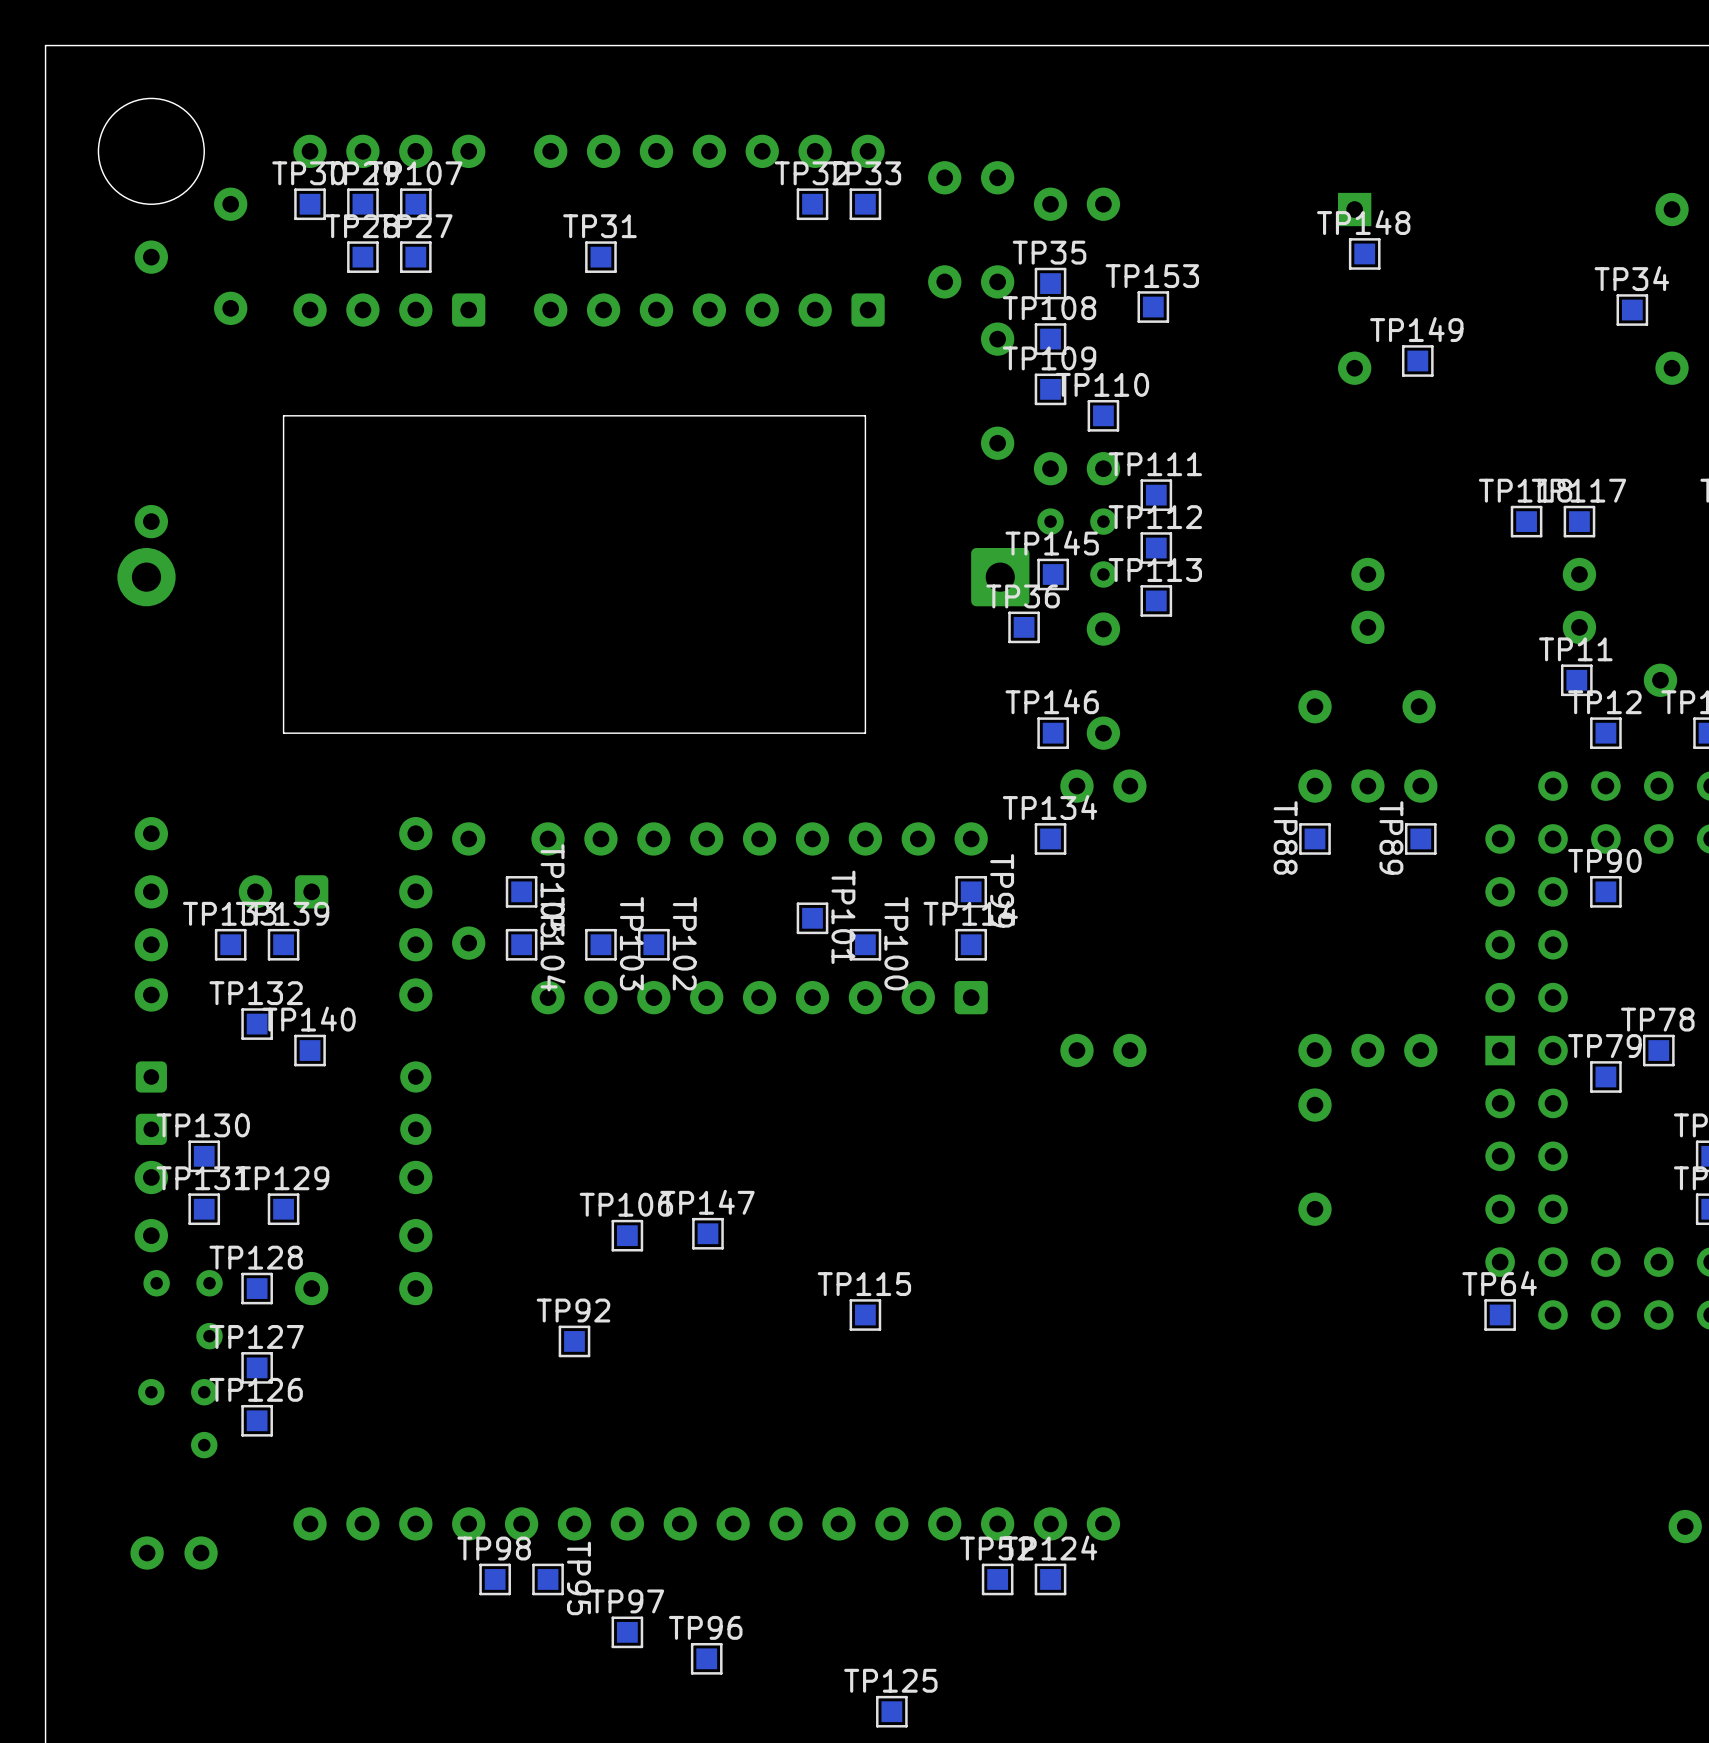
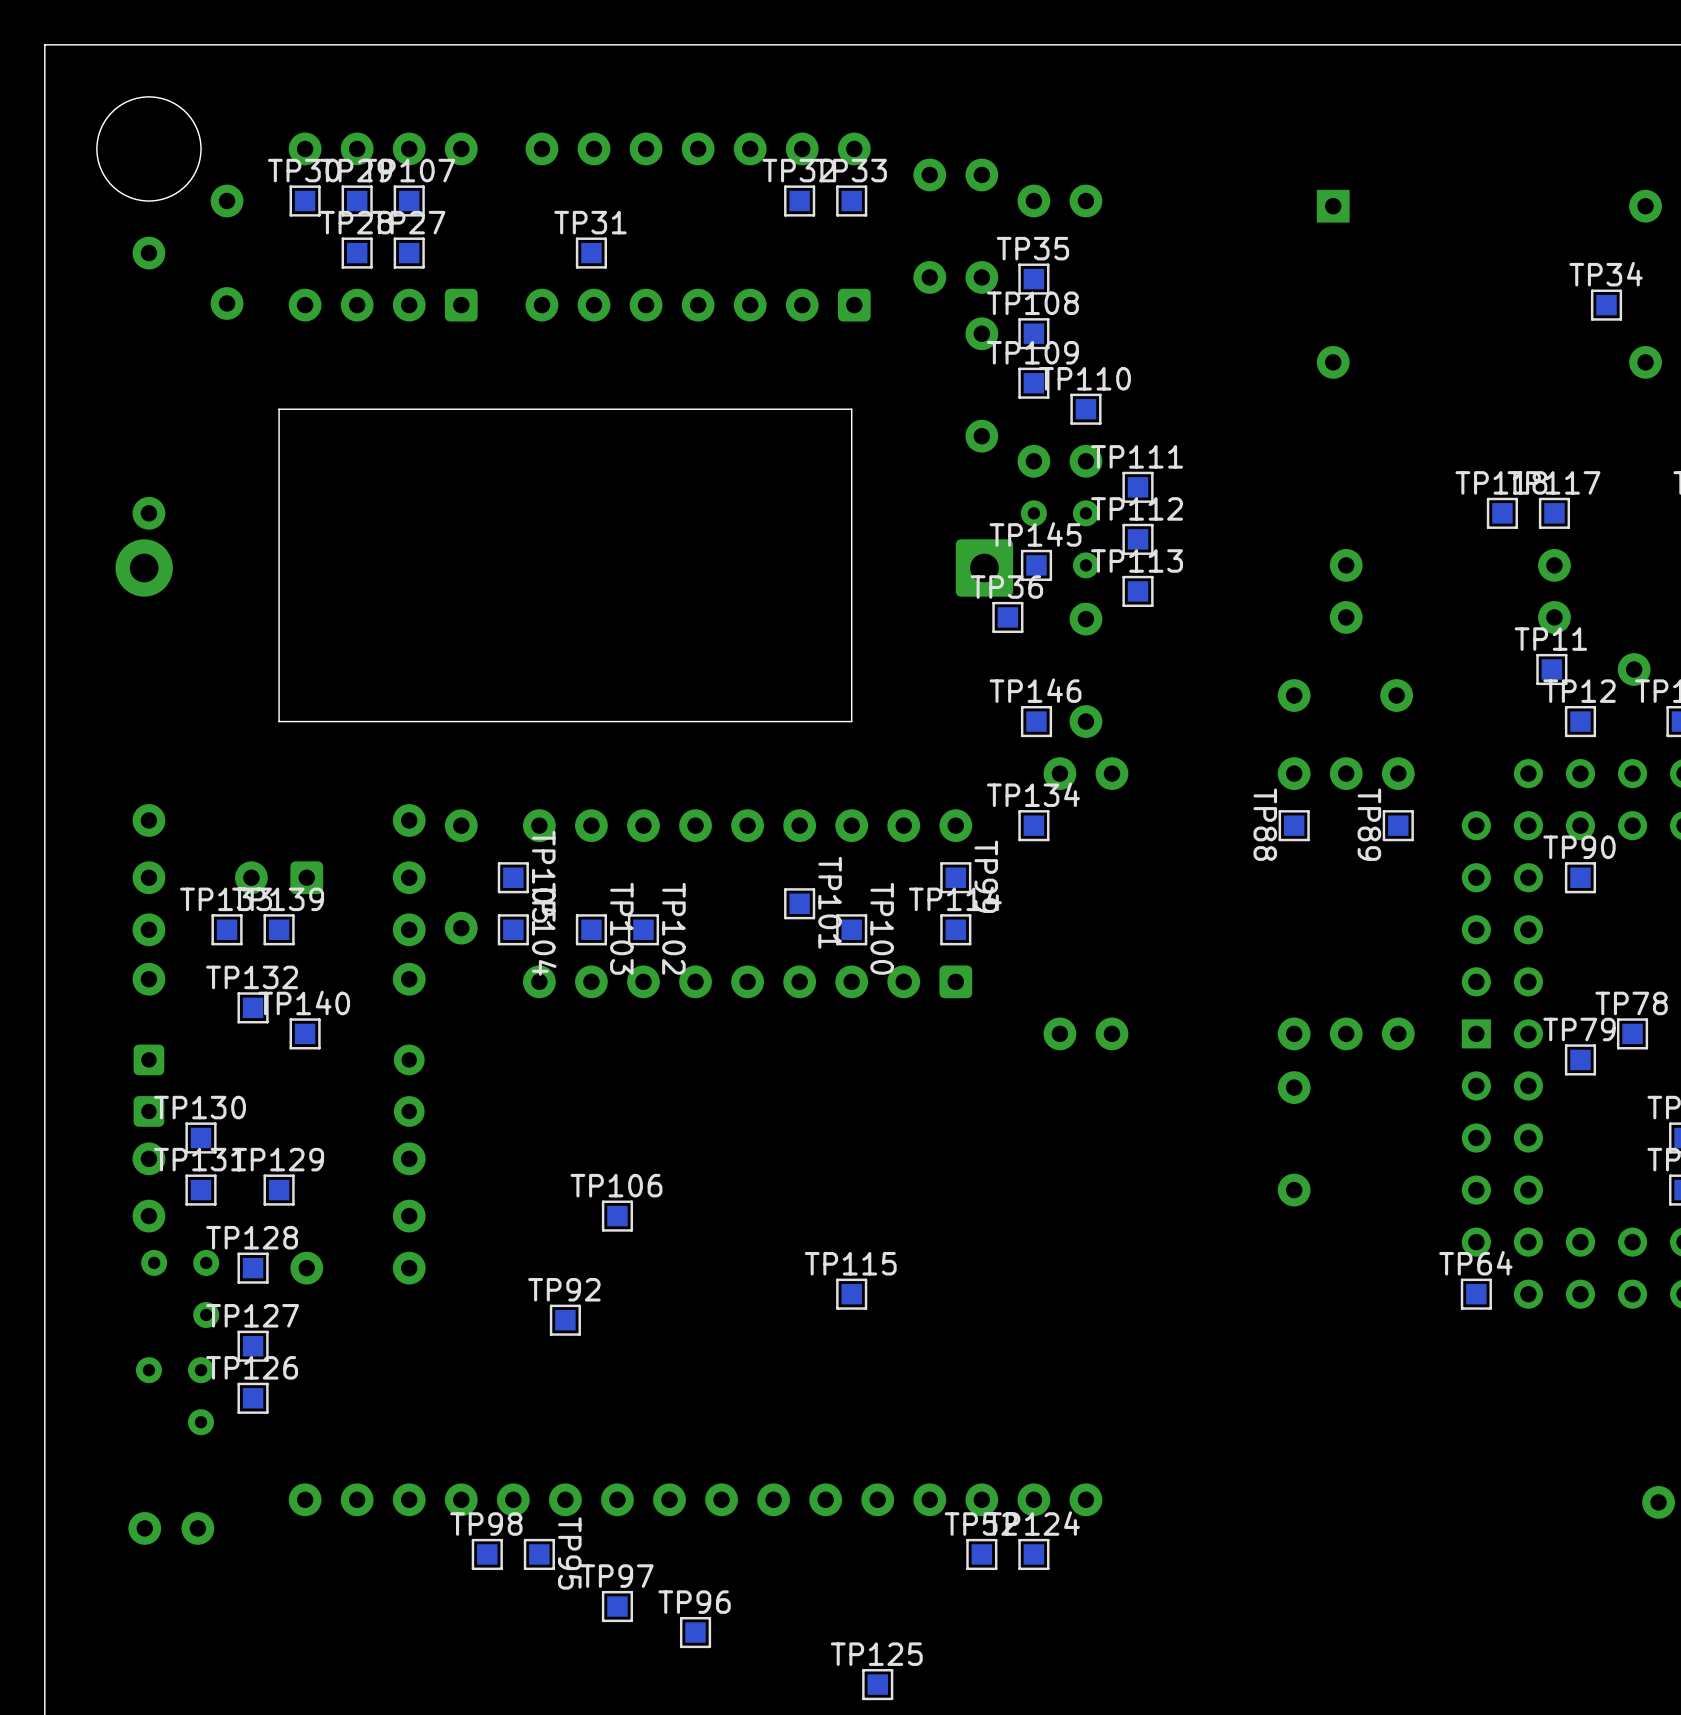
TP148: (1364, 253) -> none
TP153: (1153, 307) -> none
TP149: (1417, 360) -> none
TP147: (707, 1233) -> none

